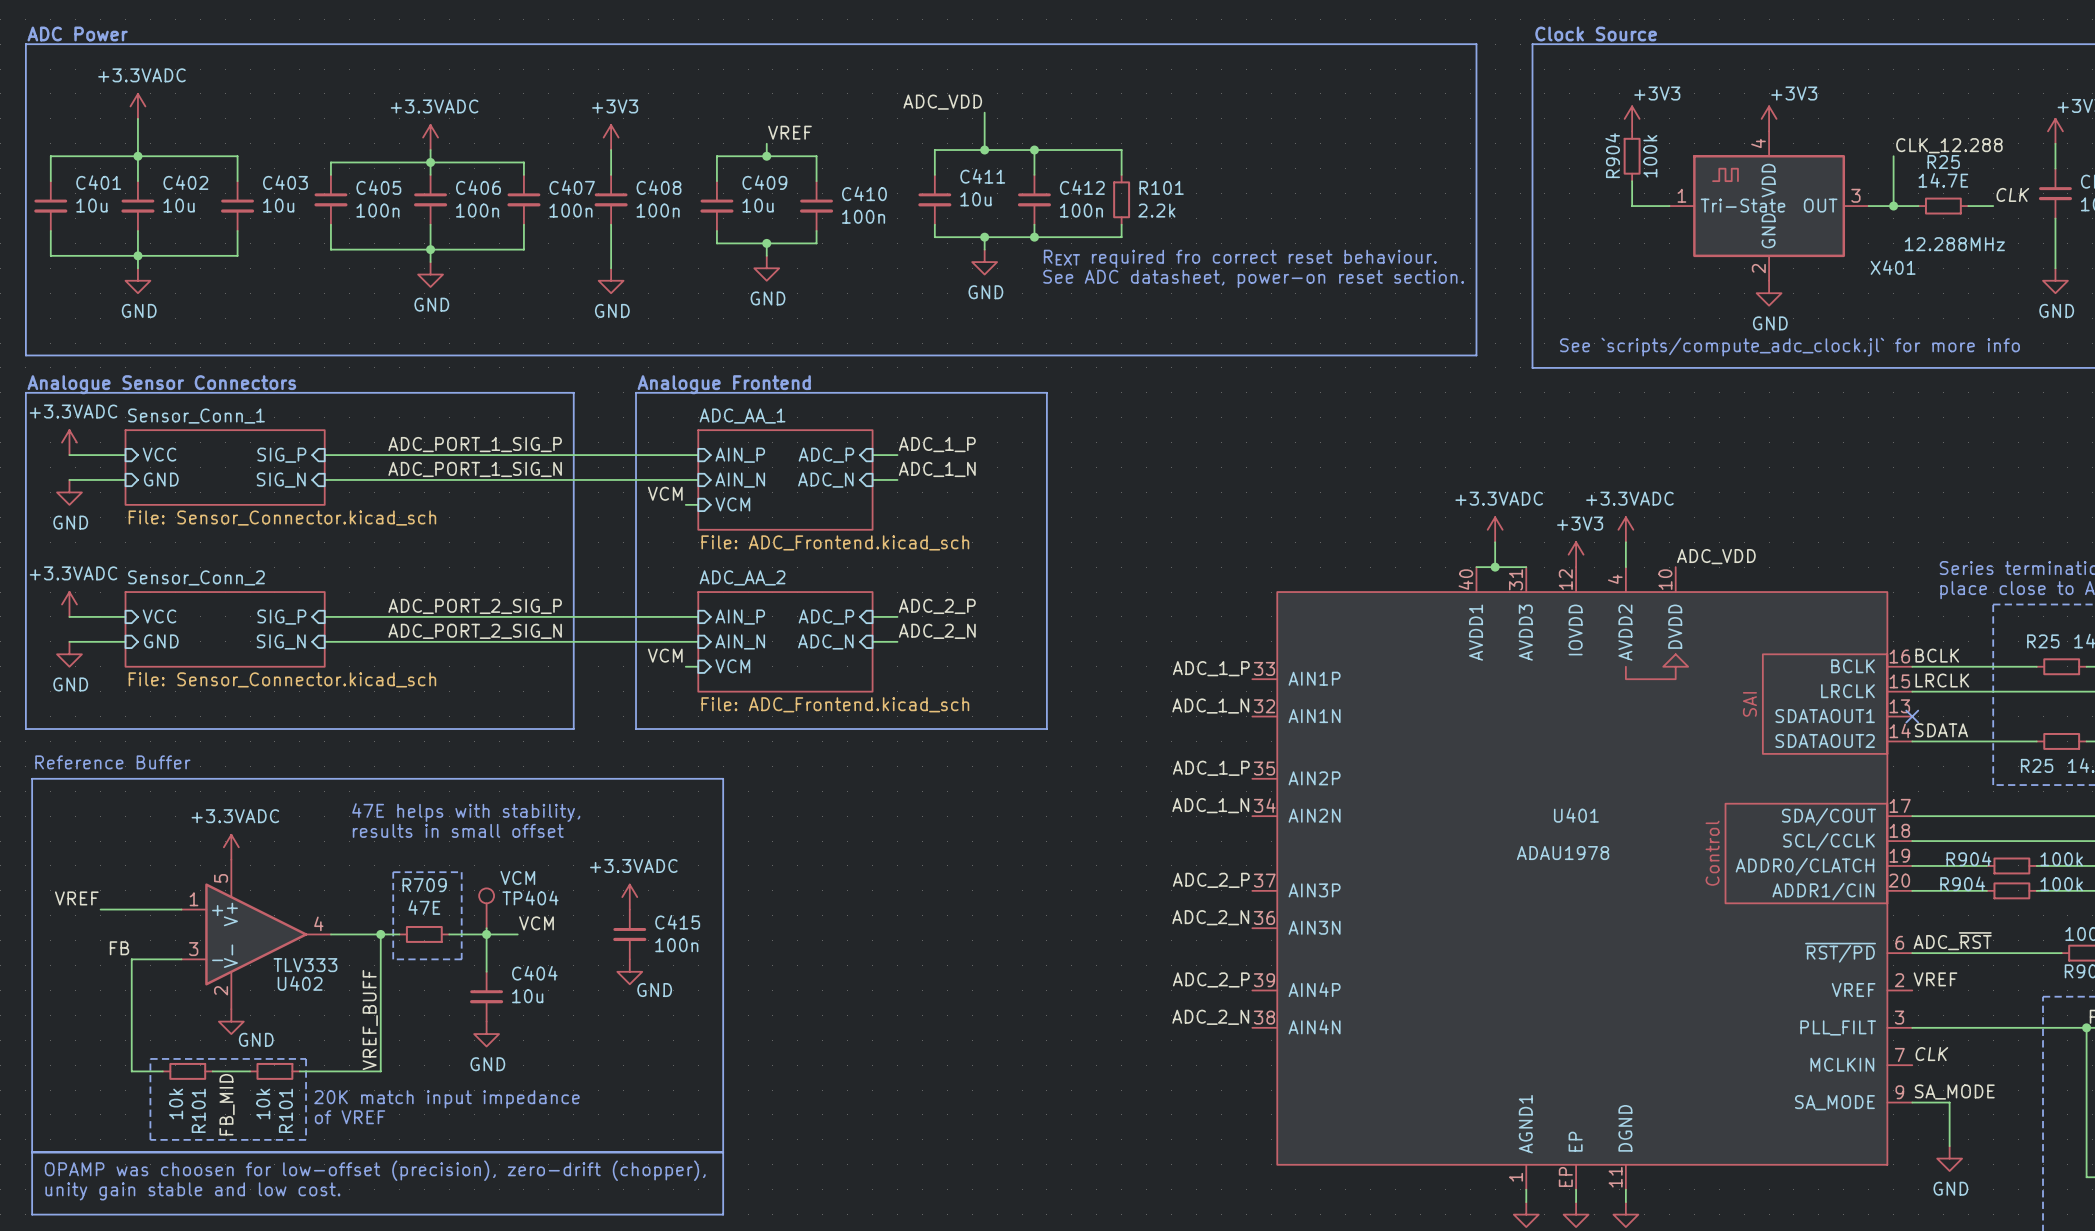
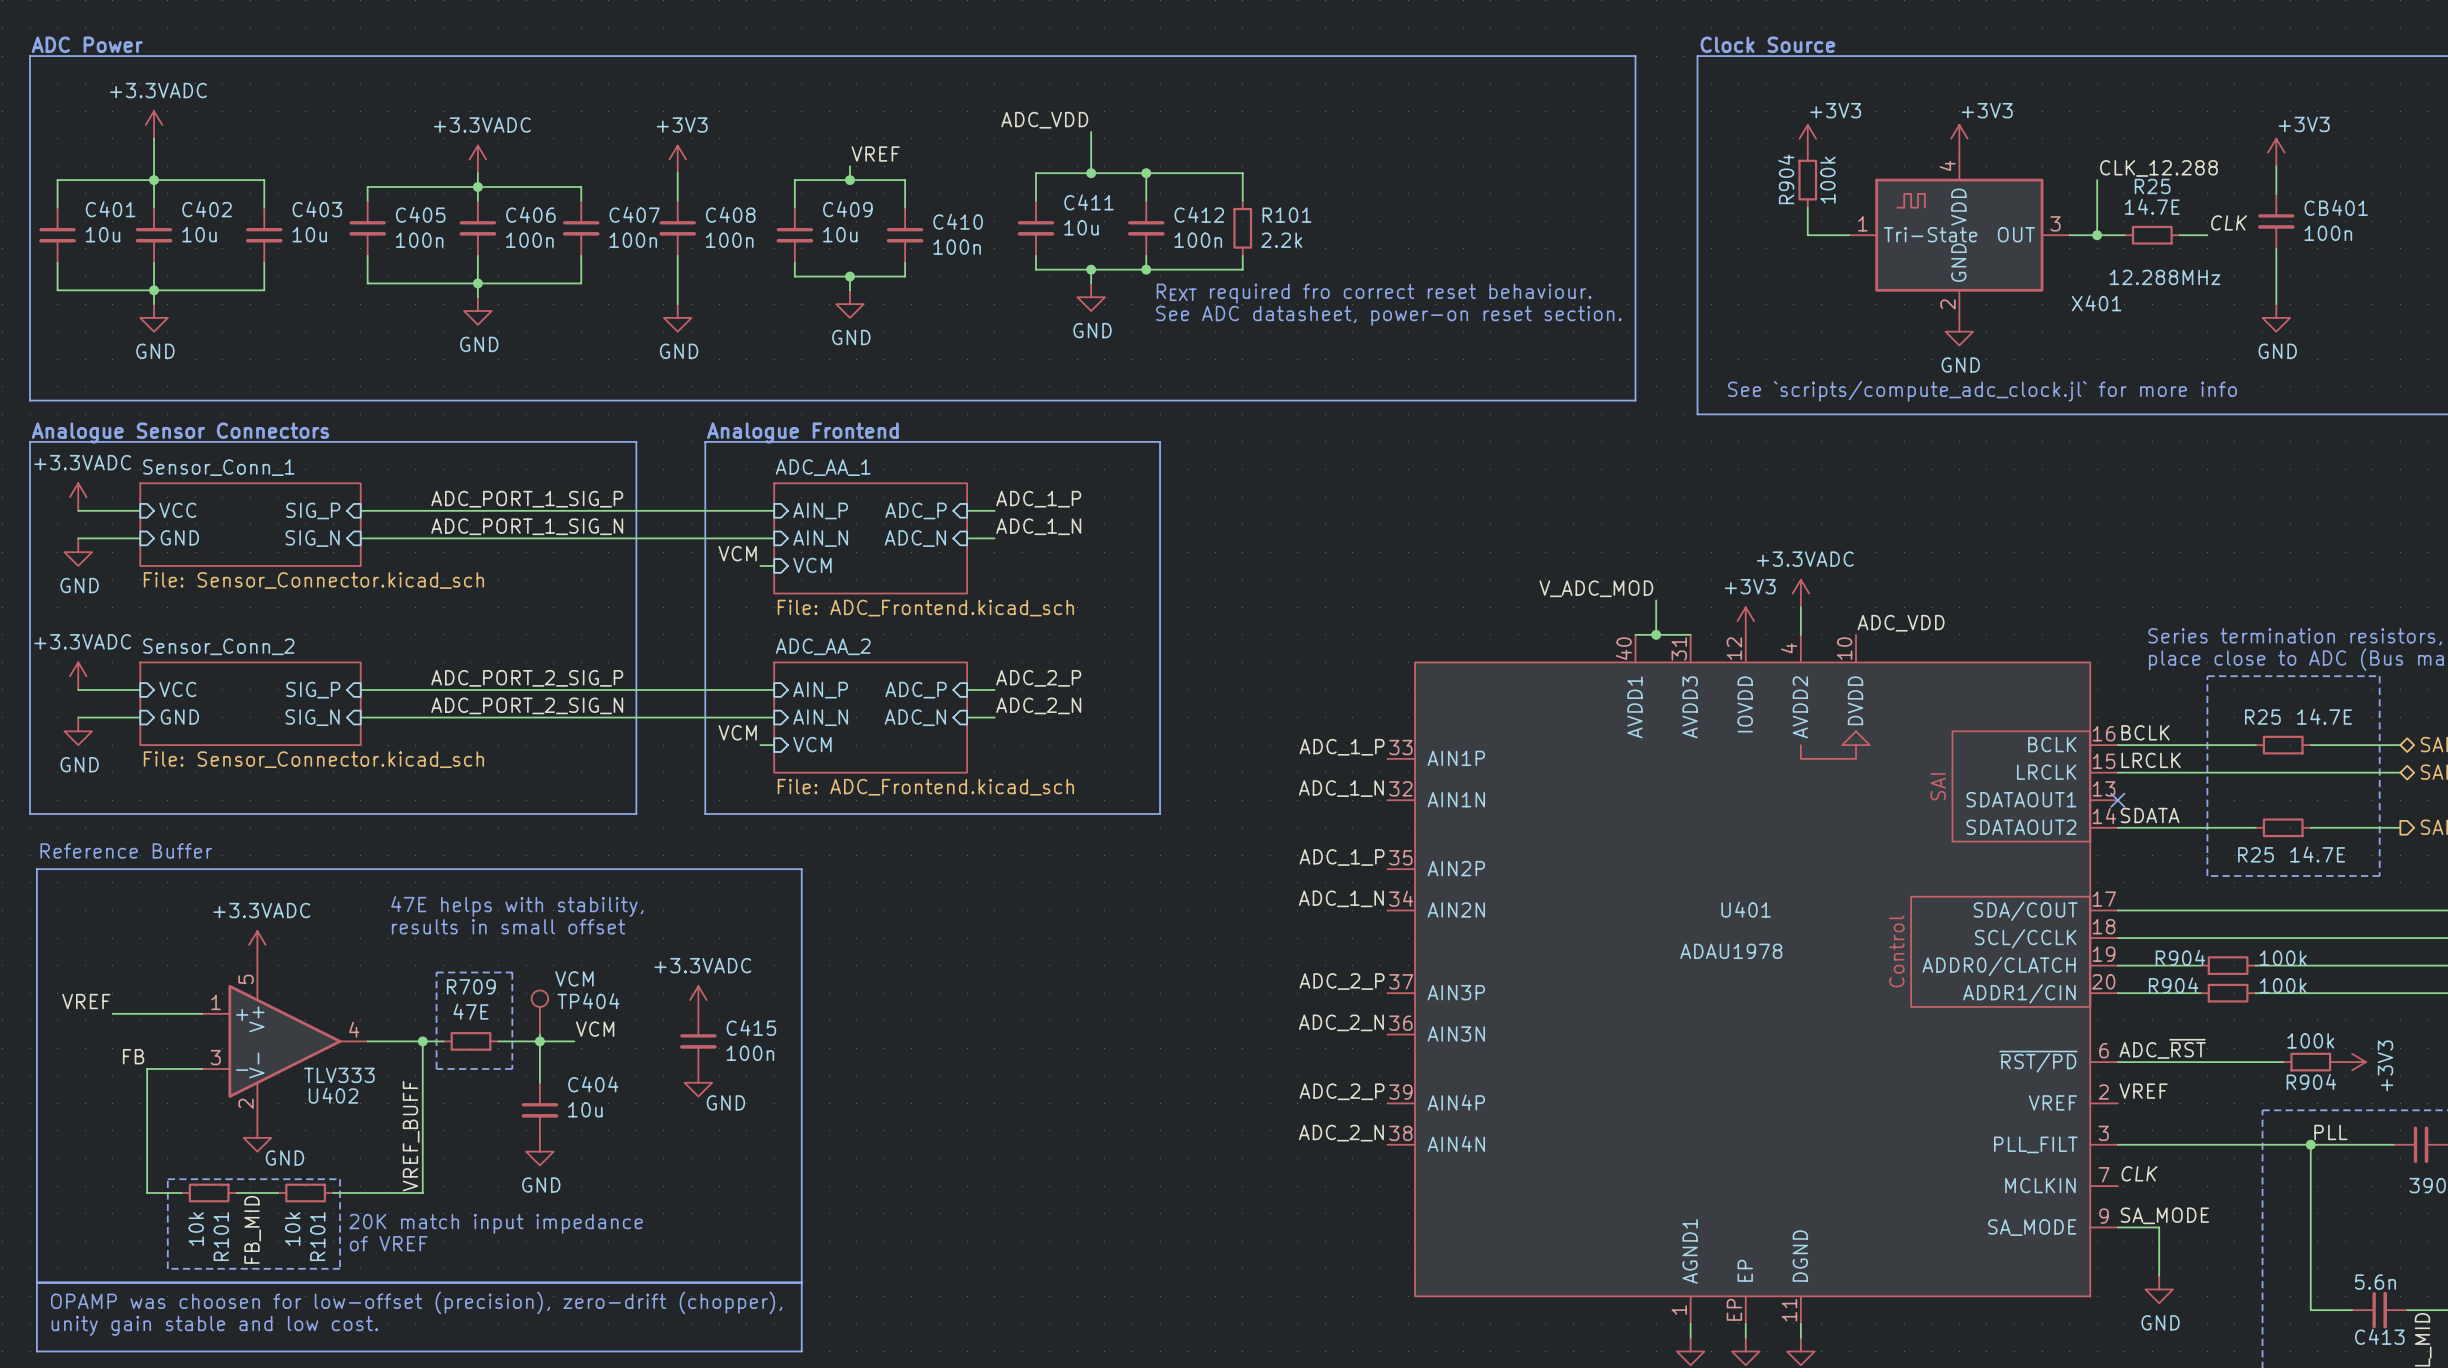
label: none -> V_ADC_MOD (1596, 588)
power symbol: +3.3VADC (1495, 529) -> none

